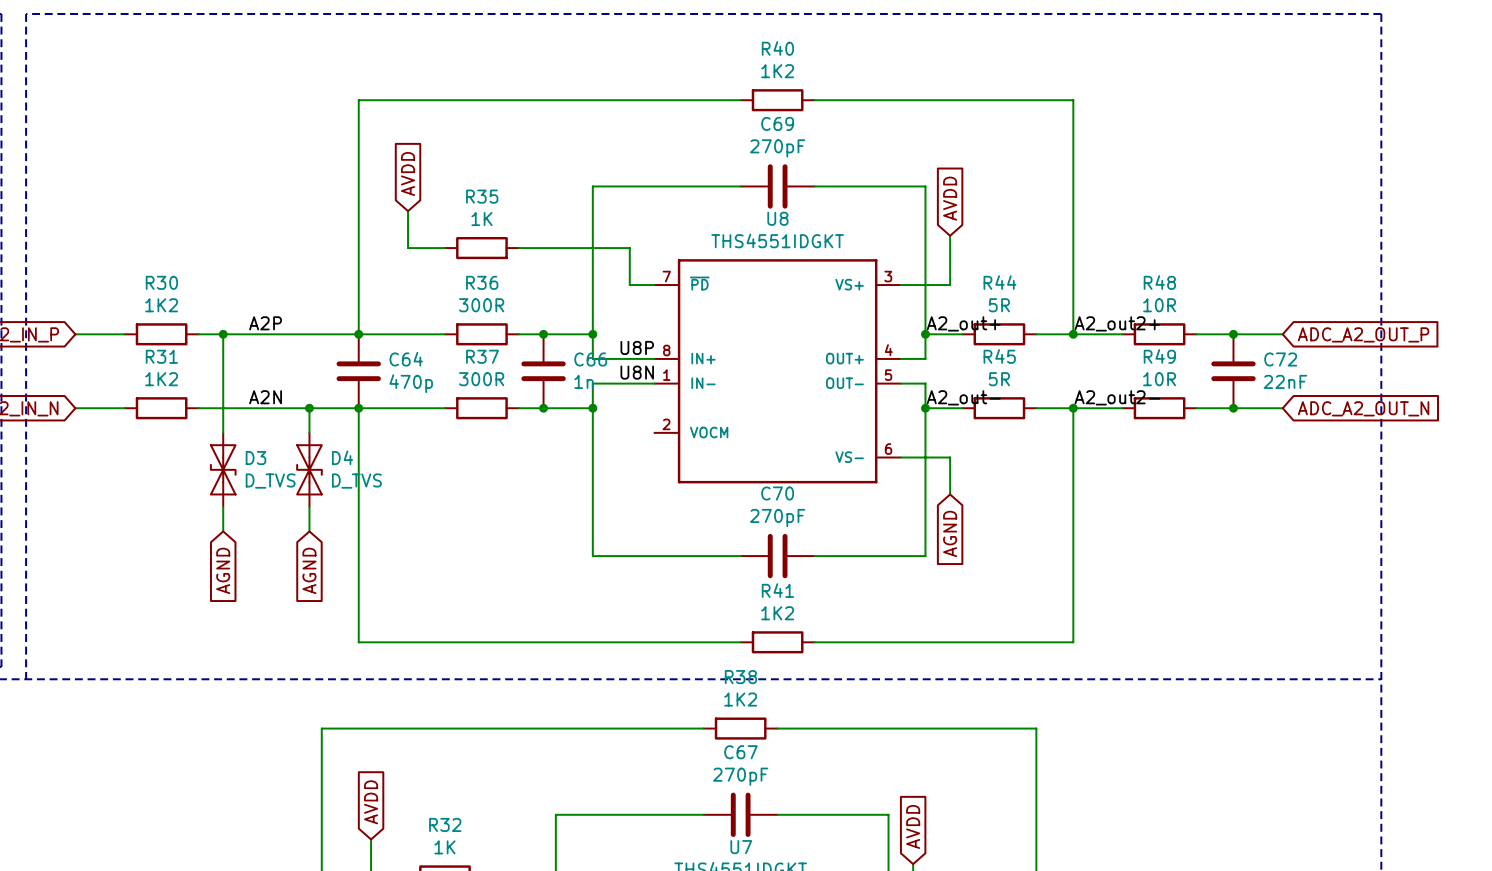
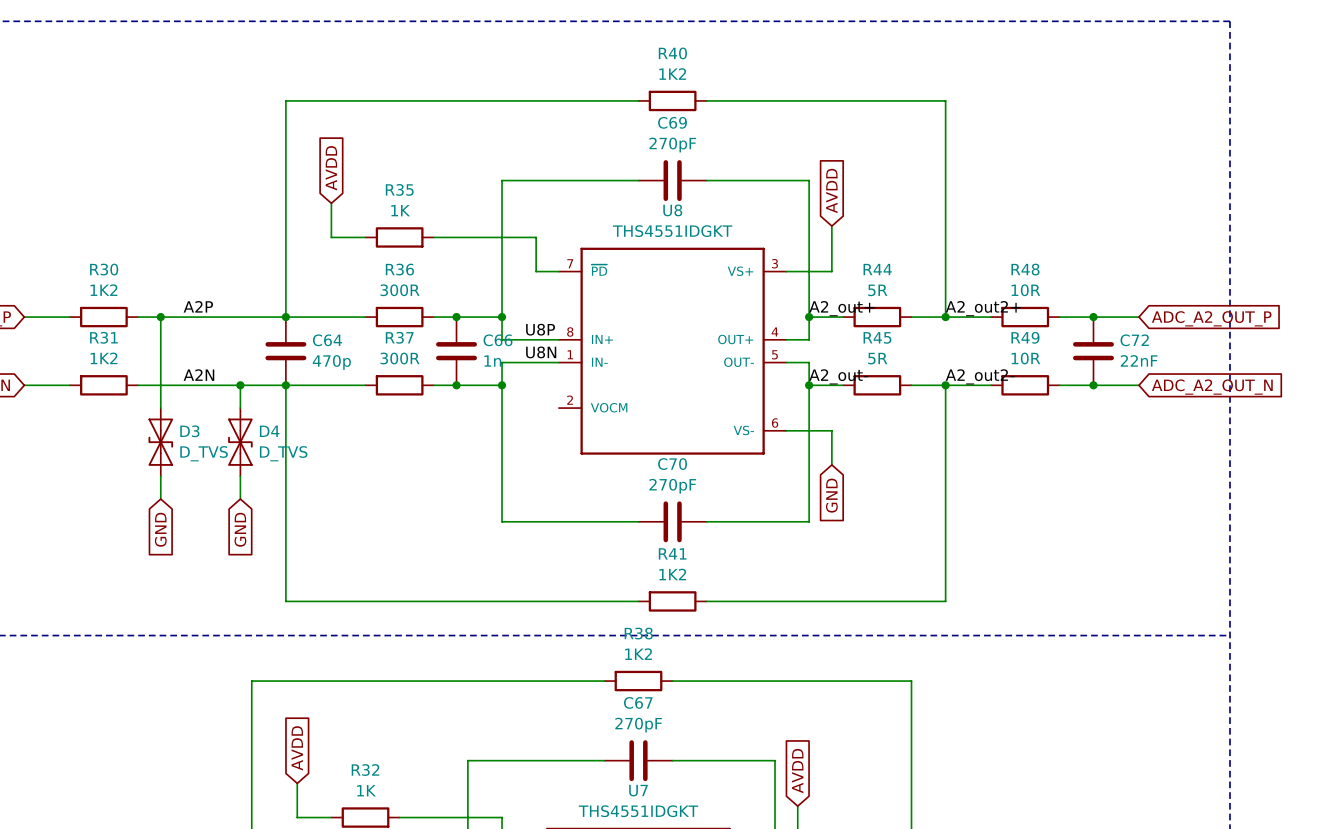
global label: AGND (950, 533) -> GND (831, 495)
global label: AGND (223, 570) -> GND (160, 529)
global label: AGND (309, 570) -> GND (240, 529)

